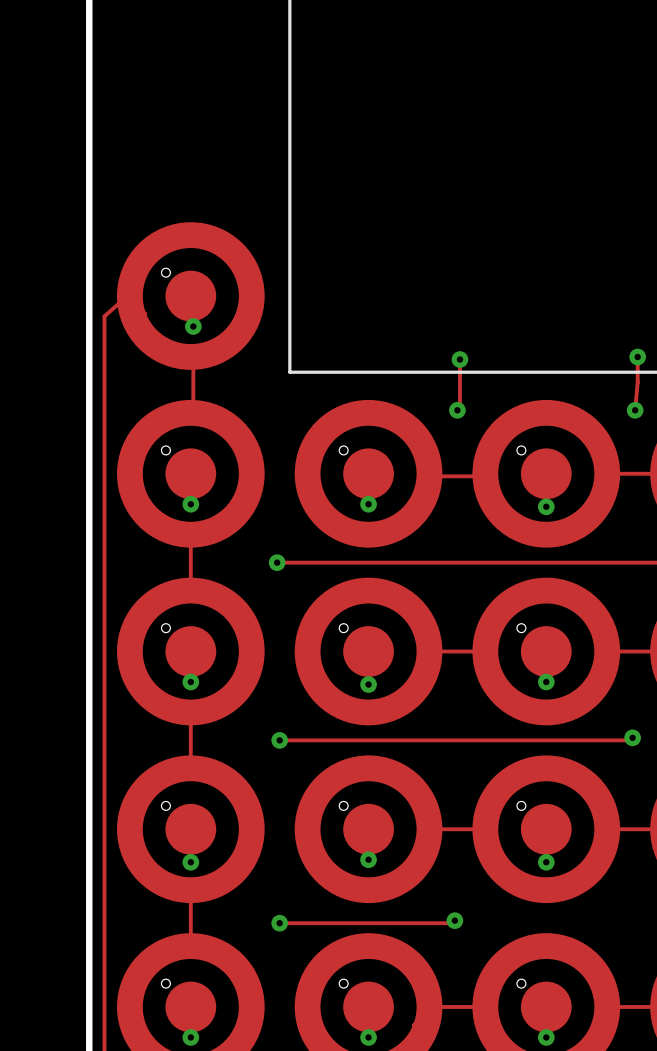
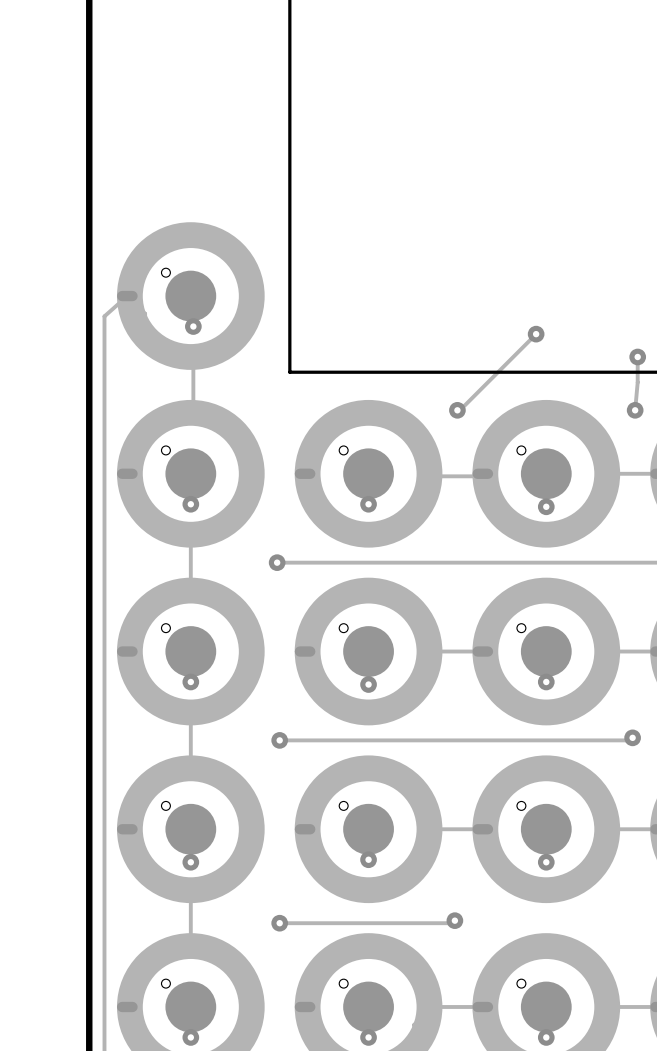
track: (459, 359) (459, 410) -> (536, 334) (459, 410)
via position: (459, 359) -> (536, 334)

